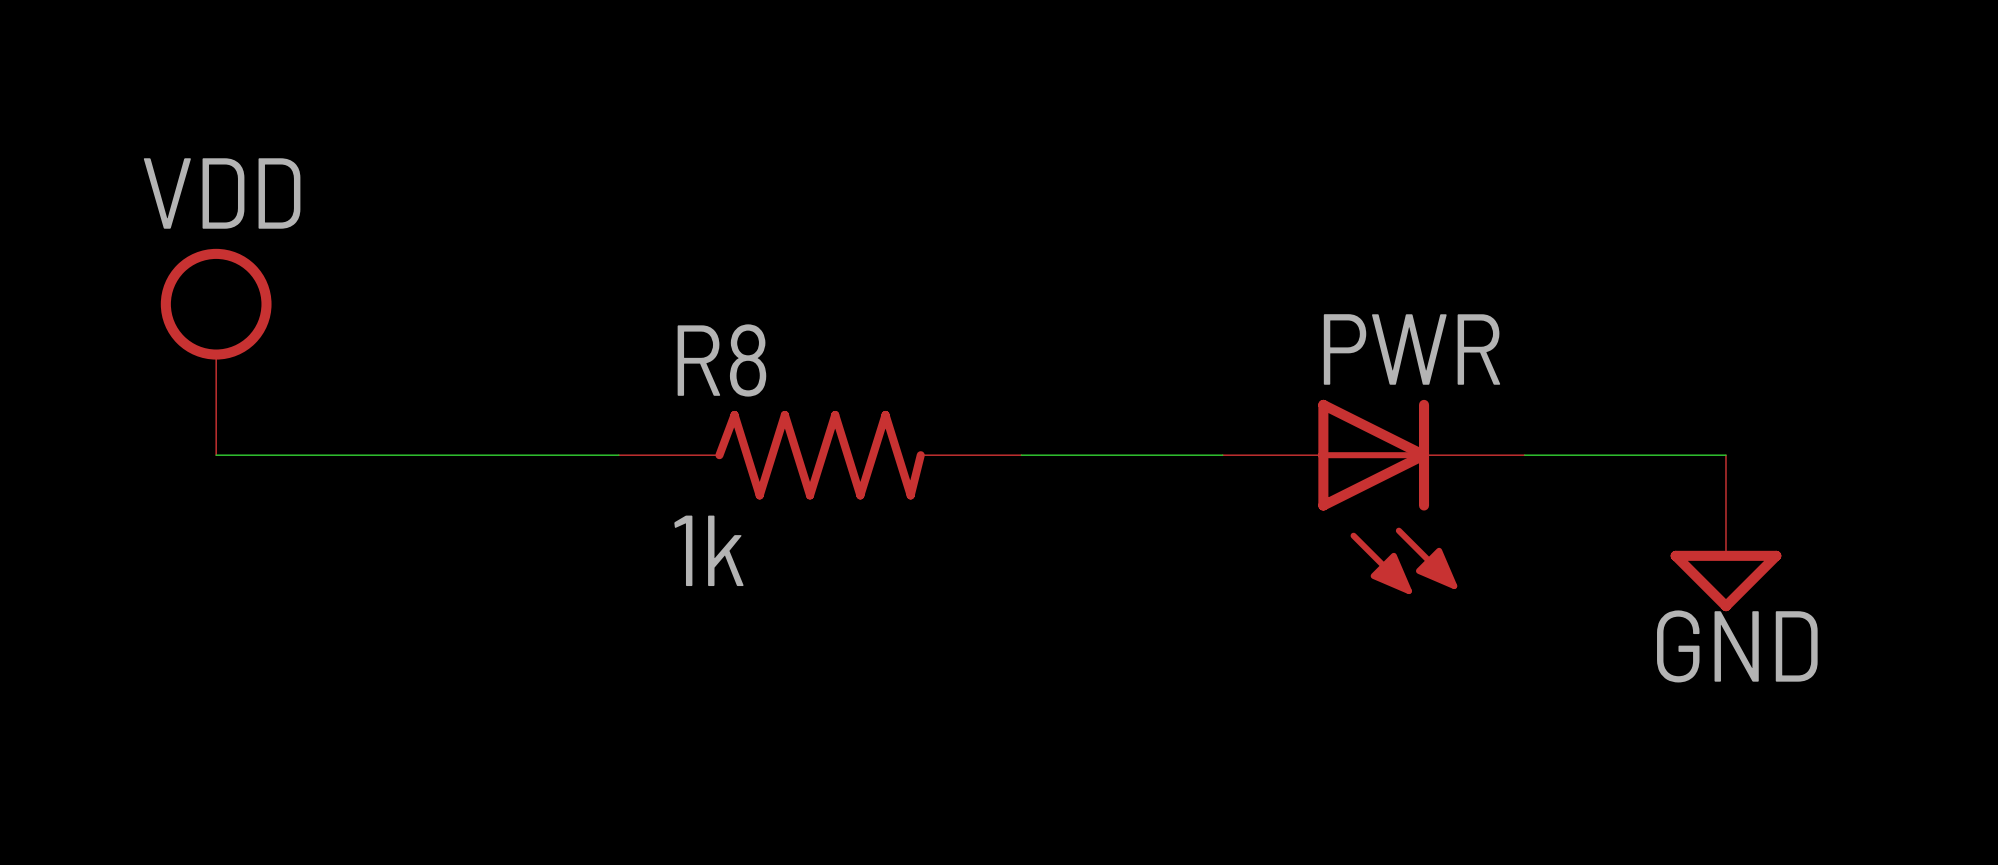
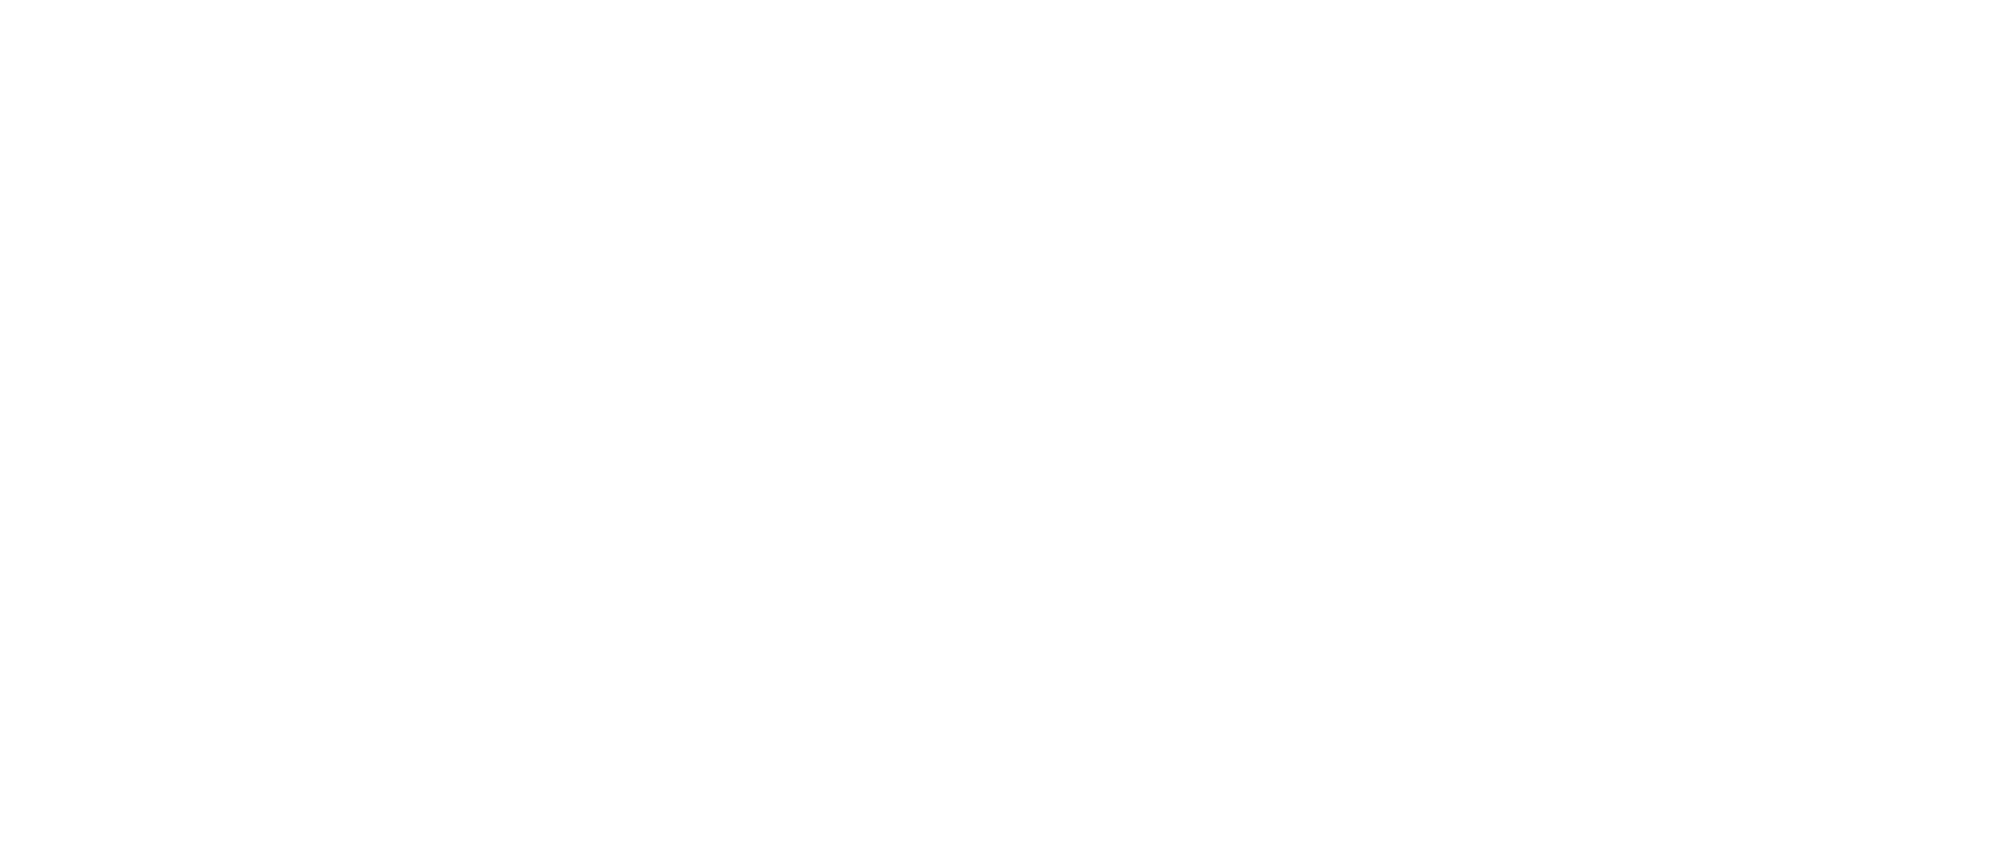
power symbol: VDD (216, 352) -> none
wire: (216, 455) (618, 455) -> none
R8: 1k (820, 455) -> none
wire: (1021, 455) (1222, 455) -> none
wire: (1524, 455) (1725, 455) -> none
PWR: (1373, 496) -> none
power symbol: GND (1725, 533) -> none

